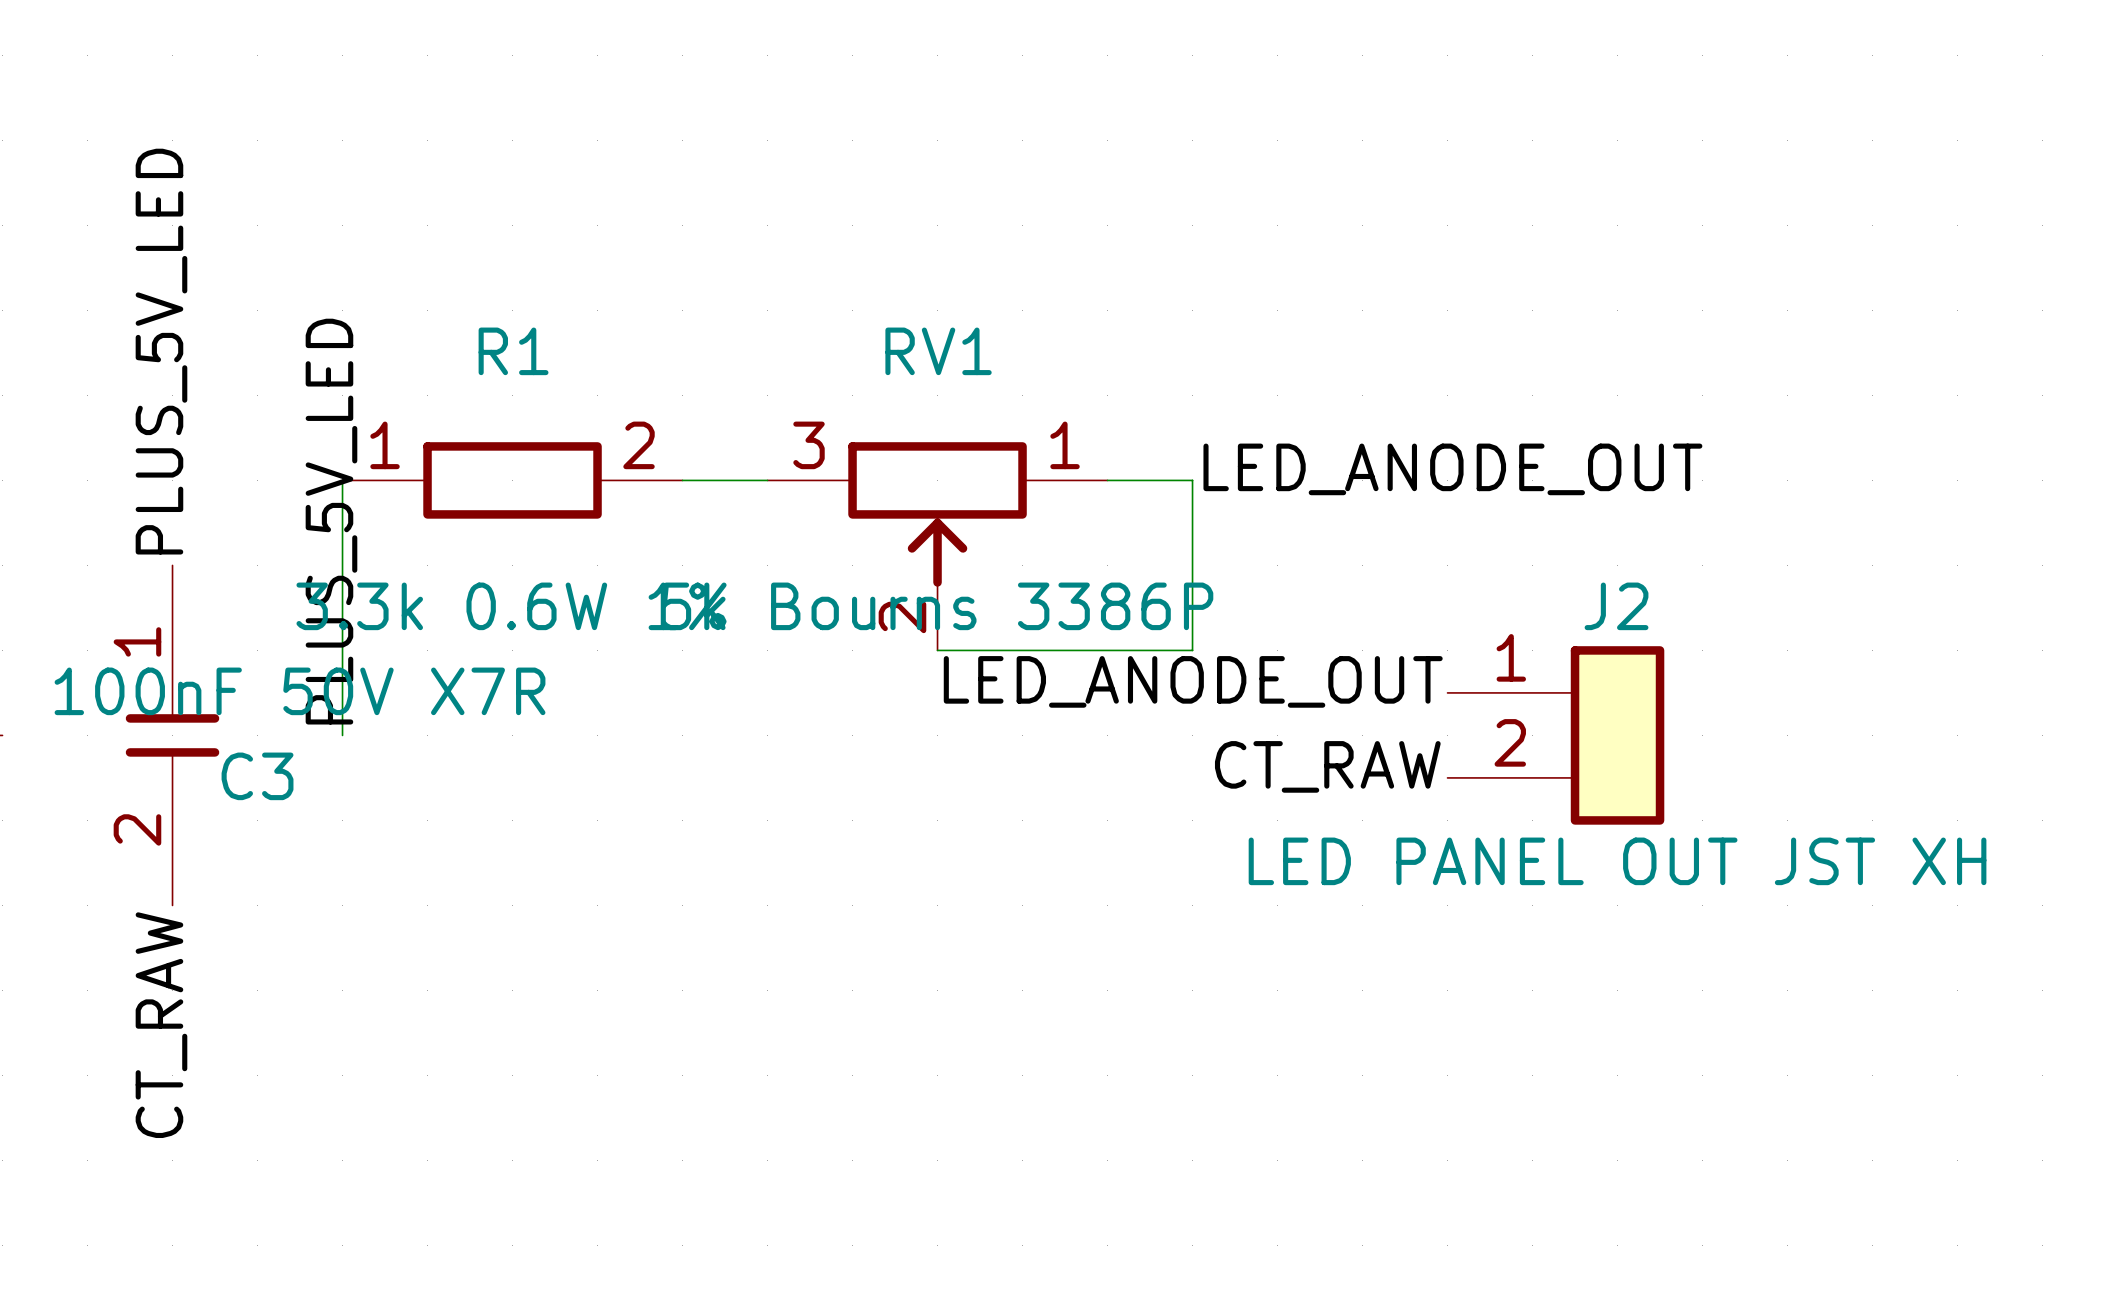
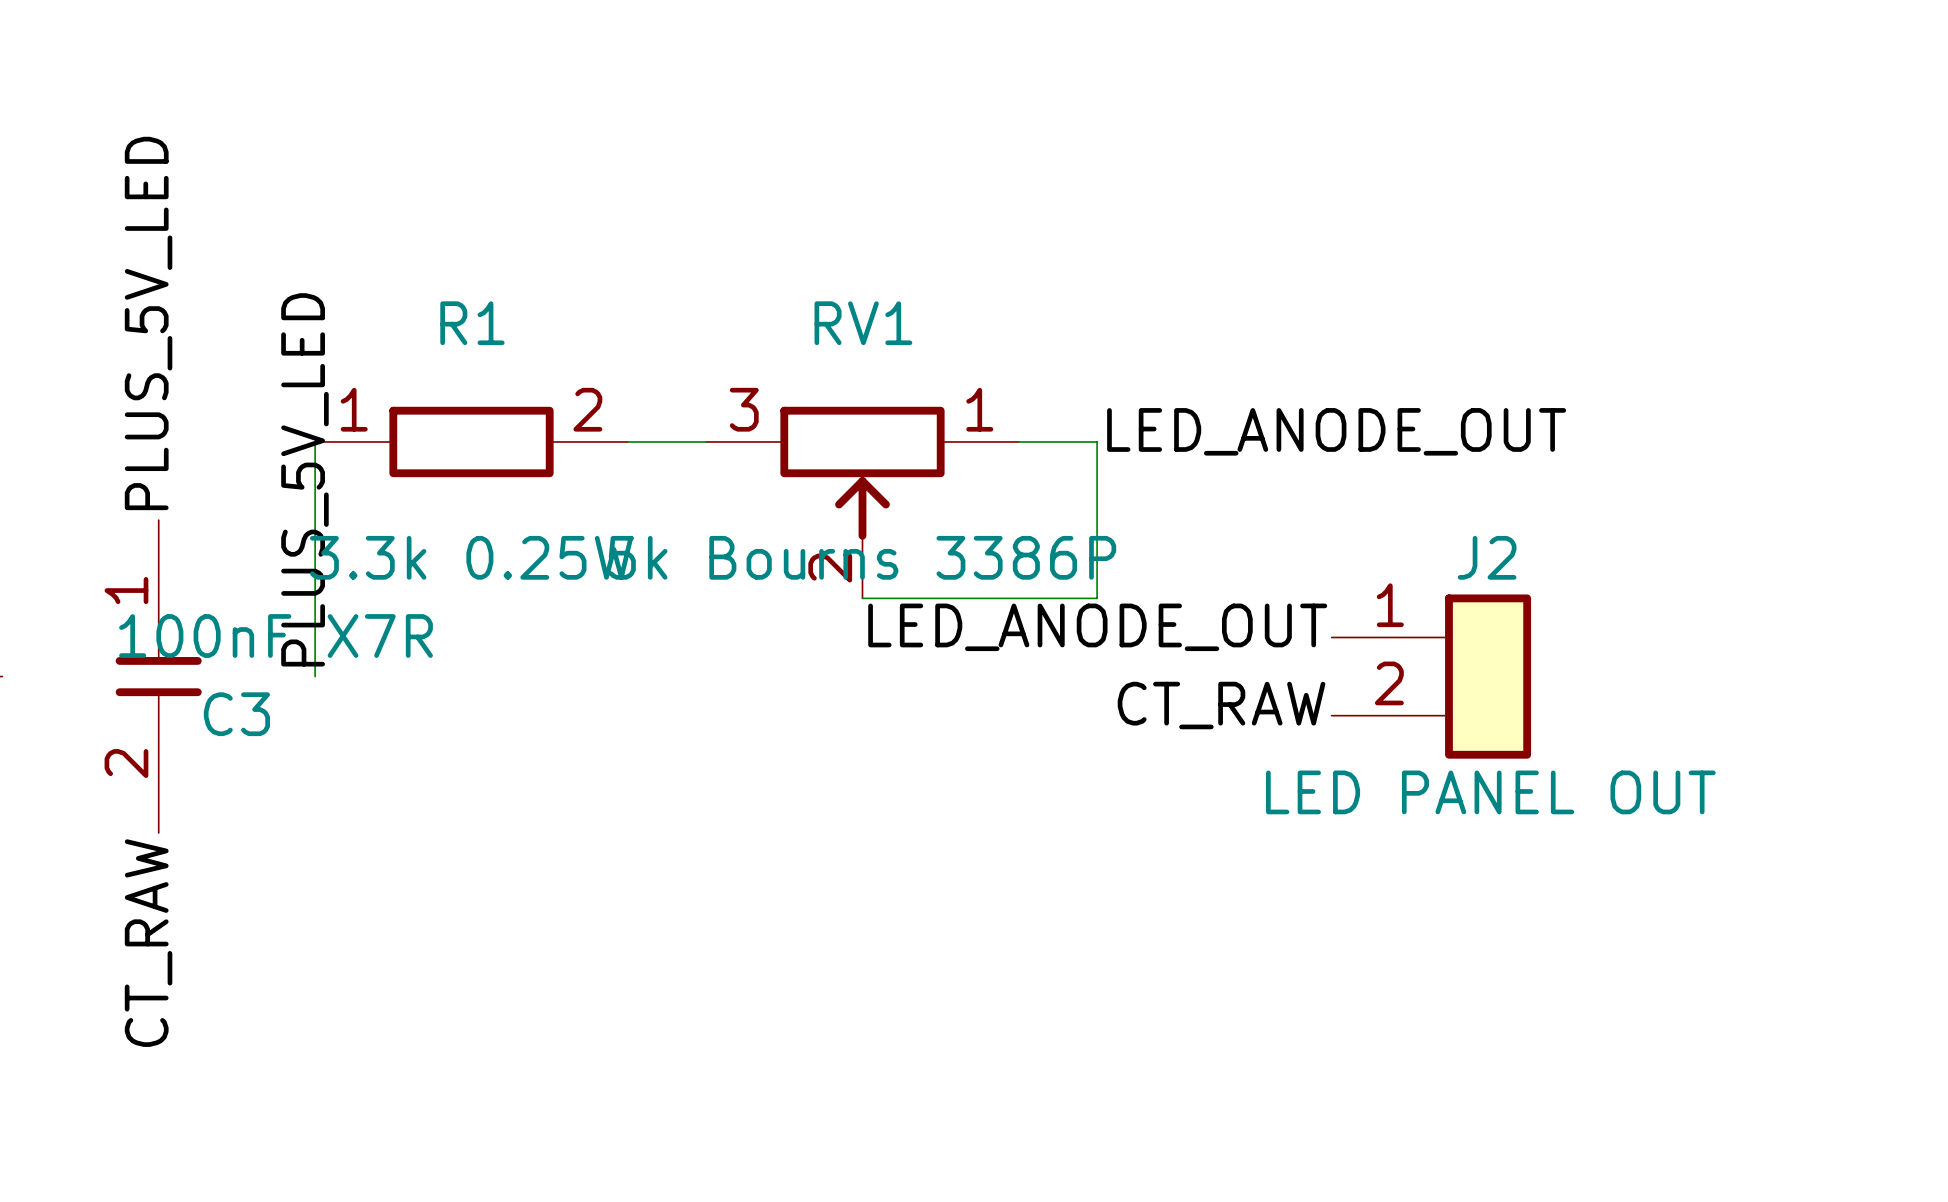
R1 value: 3.3k 0.6W 1% (511, 606) -> 3.3k 0.25W (471, 557)
C3 value: 100nF 50V X7R (300, 691) -> 100nF X7R (276, 636)
J2 value: LED PANEL OUT JST XH (1617, 861) -> LED PANEL OUT (1490, 792)

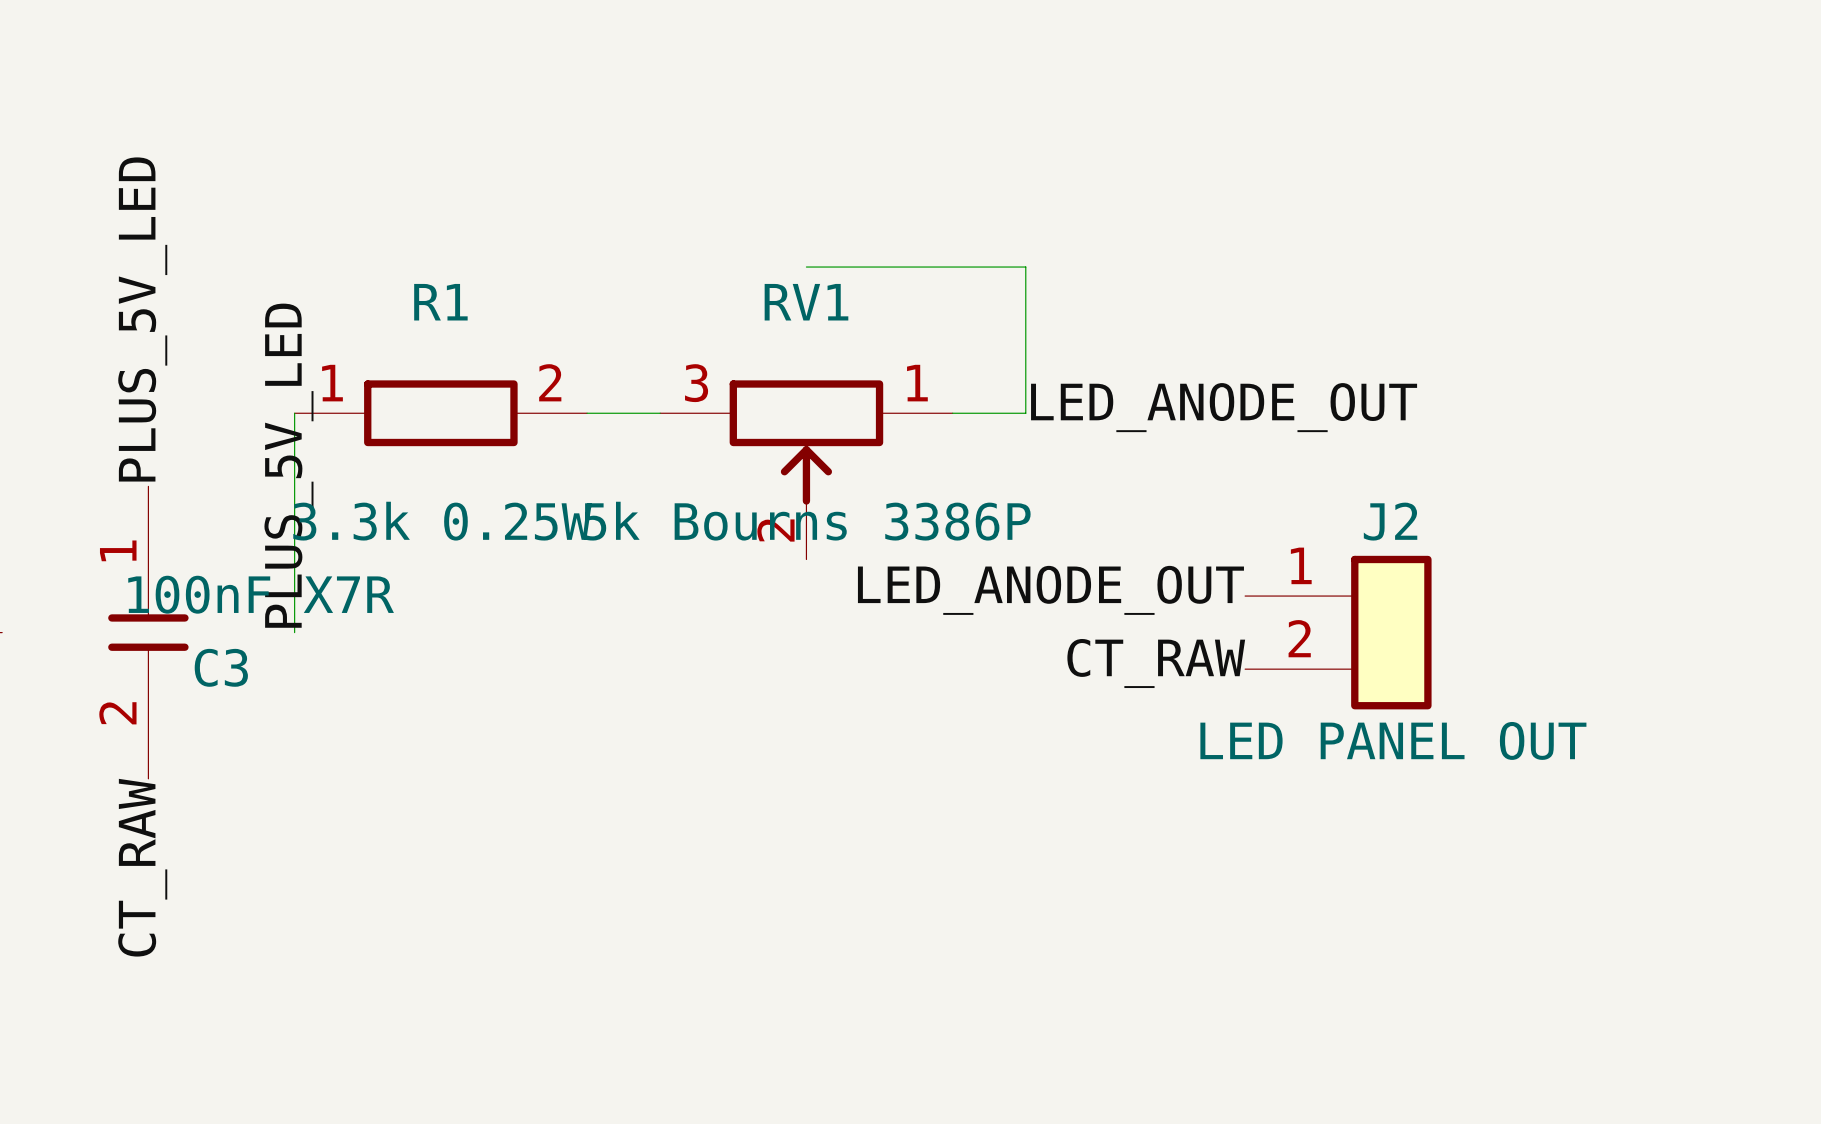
wire: (1097, 441) (1097, 598) (862, 598) -> (1025, 413) (1025, 267) (806, 267)

